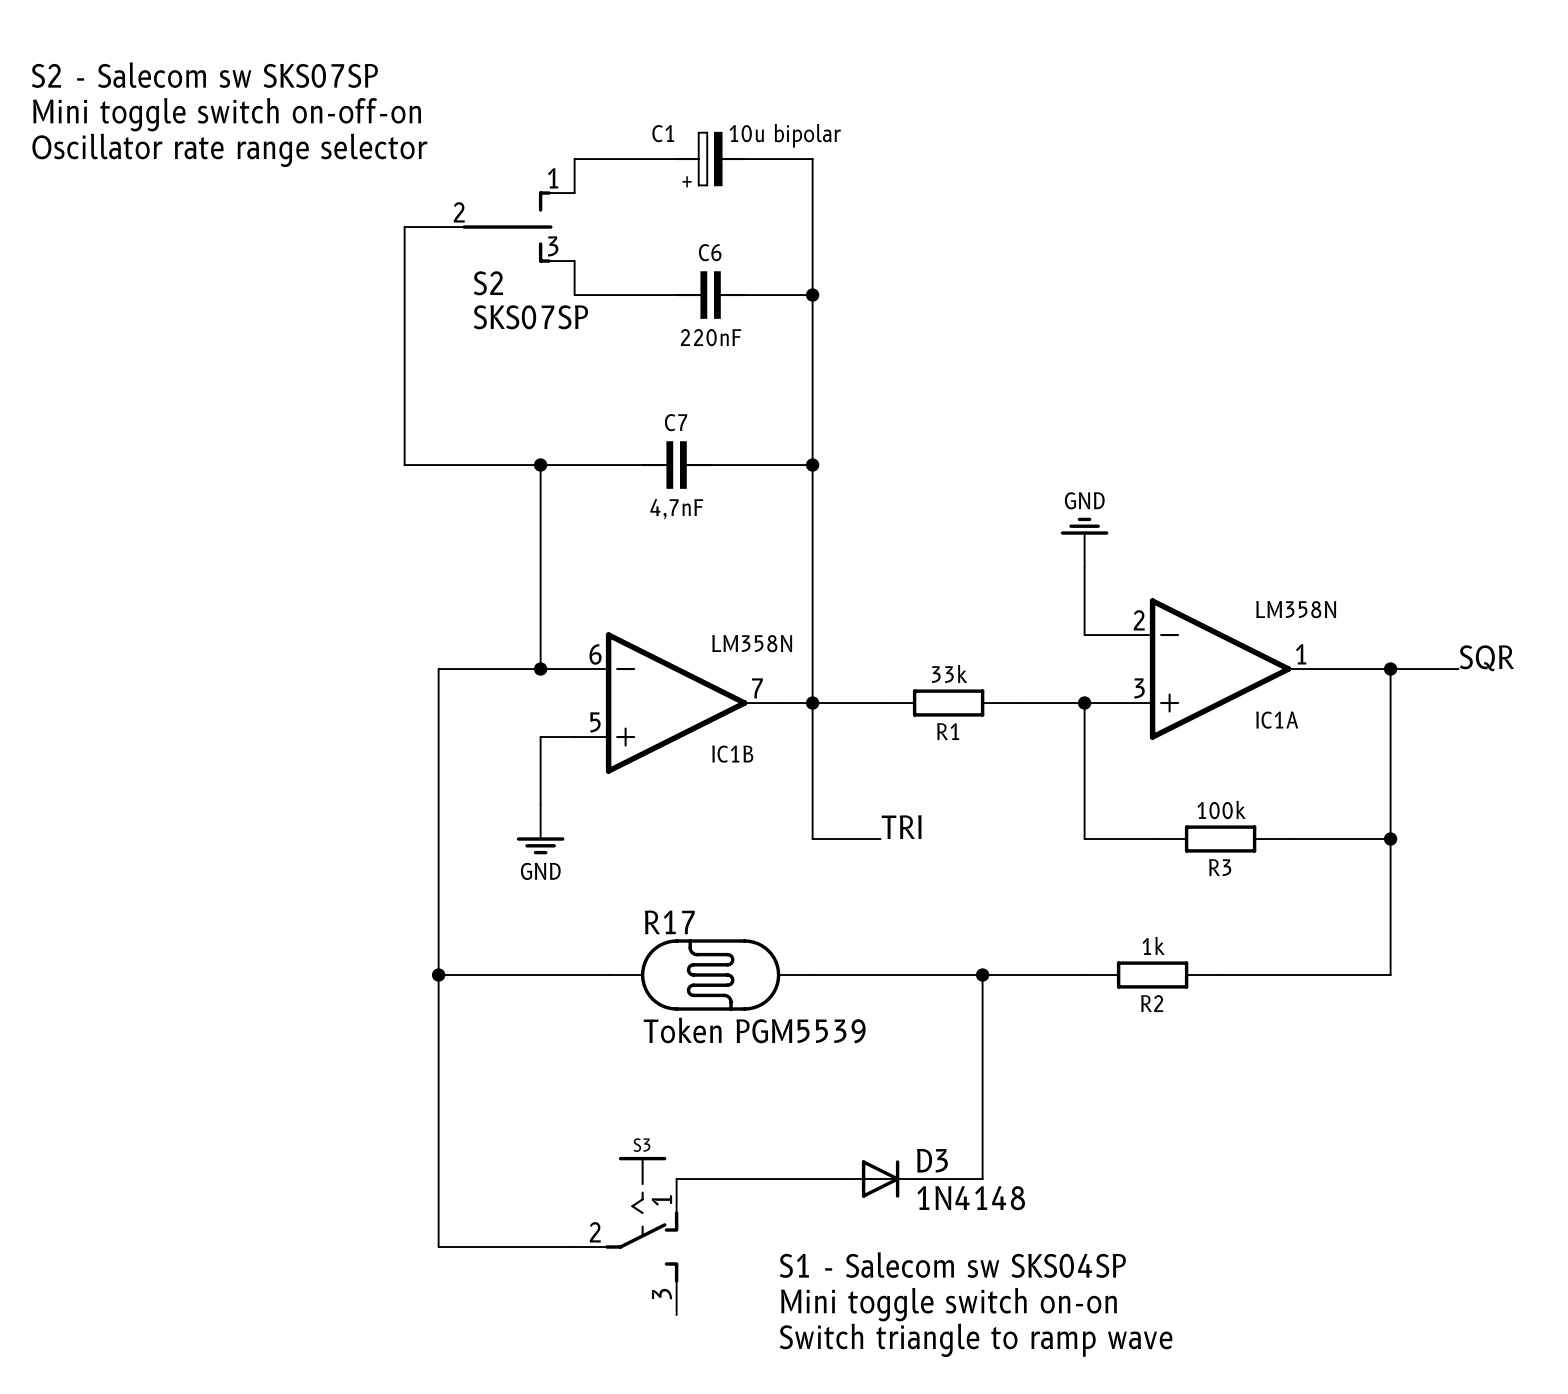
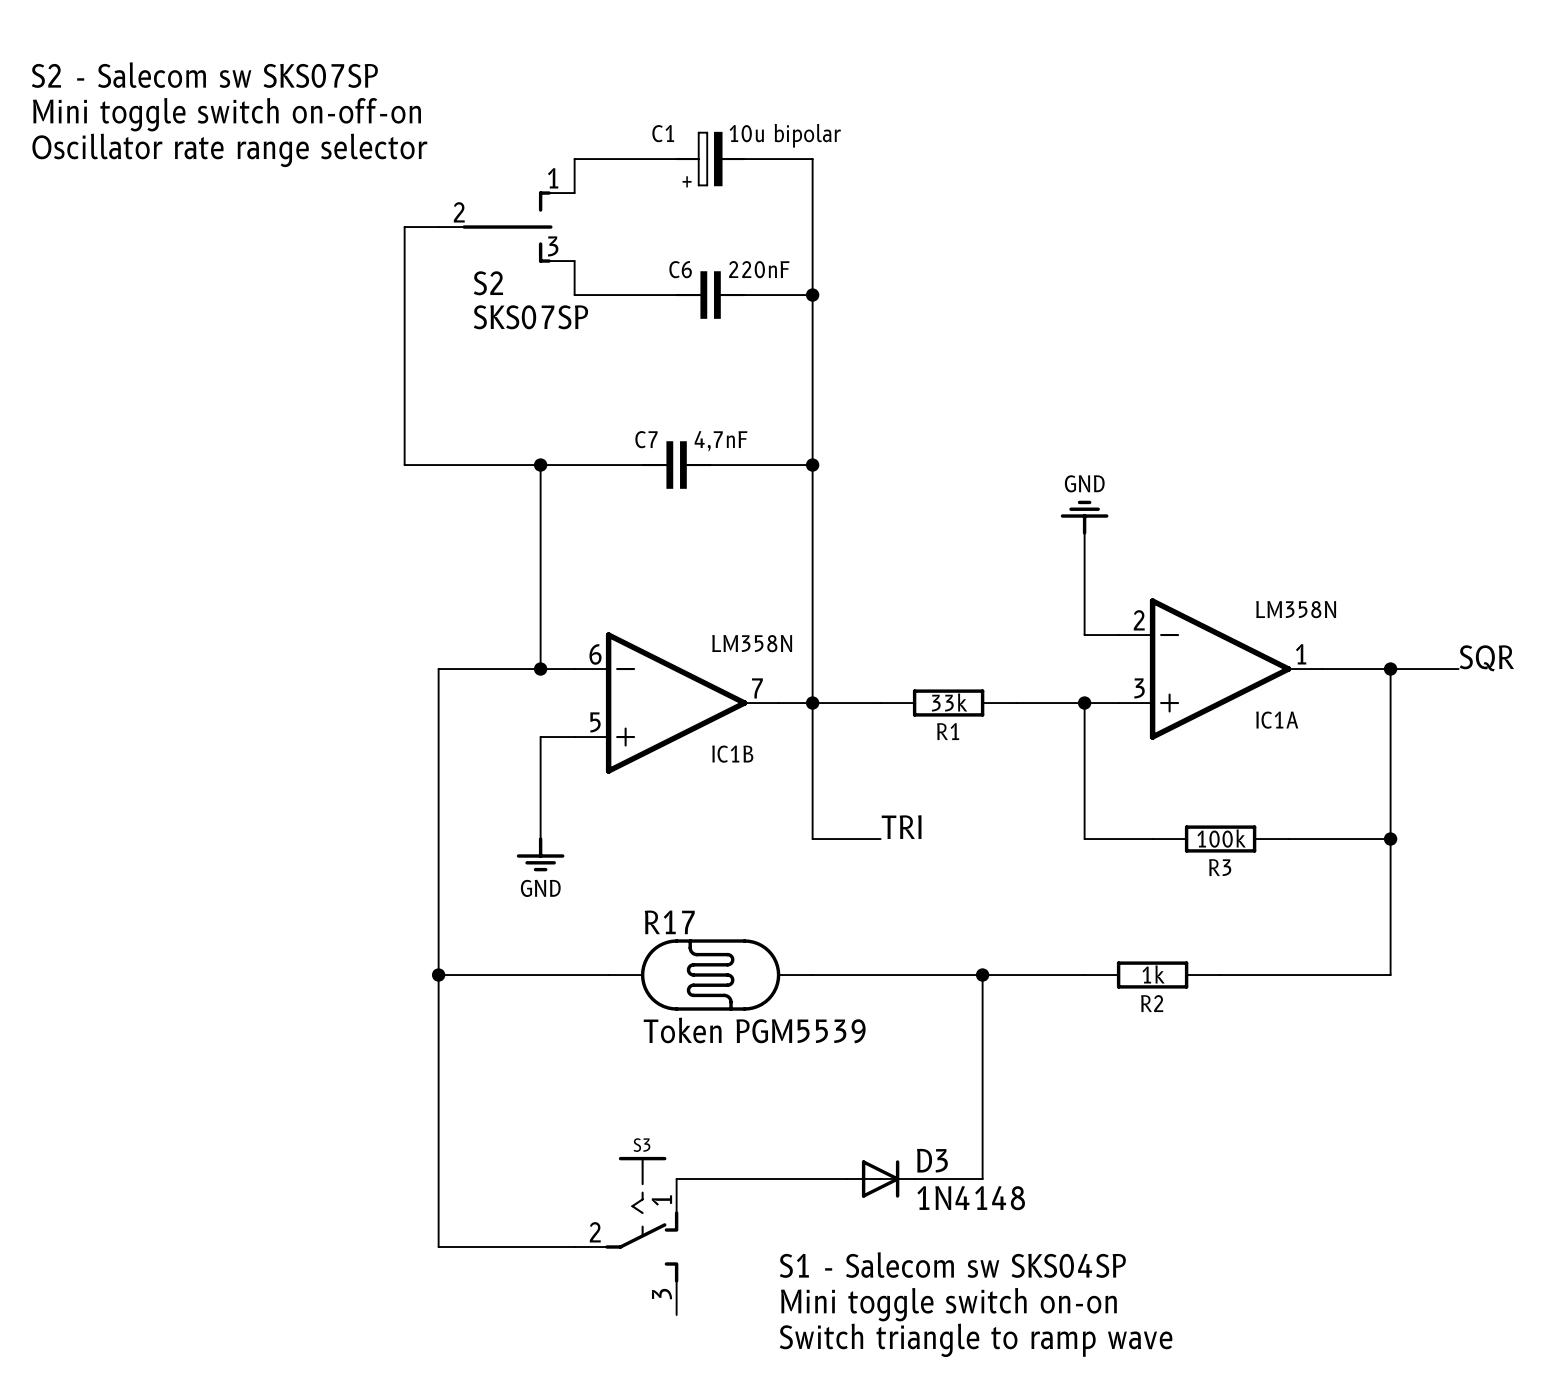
C6 name position: C6 (710, 252) -> C6 (680, 269)
C6 value position: 220nF (711, 337) -> 220nF (759, 269)
C7 name position: C7 (676, 422) -> C7 (646, 439)
C7 value position: 4,7nF (676, 509) -> 4,7nF (721, 441)
power symbol: none -> GND (1084, 517)
power symbol: GND (1084, 542) -> none
R1 value position: 33k (949, 673) -> 33k (949, 702)
R3 value position: 100k (1221, 809) -> 100k (1221, 838)
power symbol: GND (540, 829) -> none
power symbol: none -> GND (540, 854)
R2 value position: 1k (1153, 945) -> 1k (1153, 974)

